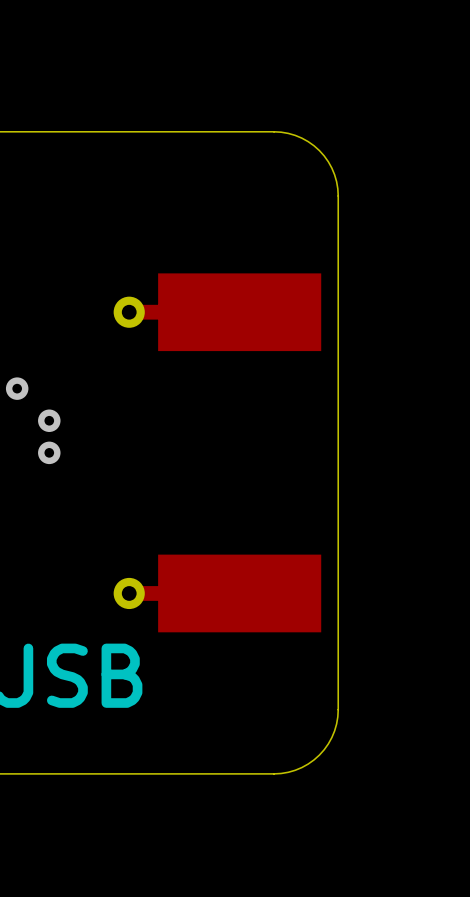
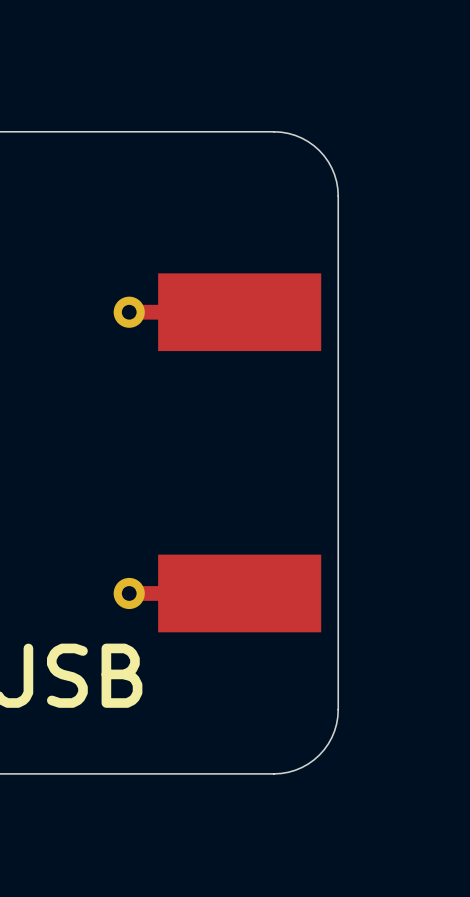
via: (17, 388) -> none
via: (49, 420) -> none
via: (49, 452) -> none

